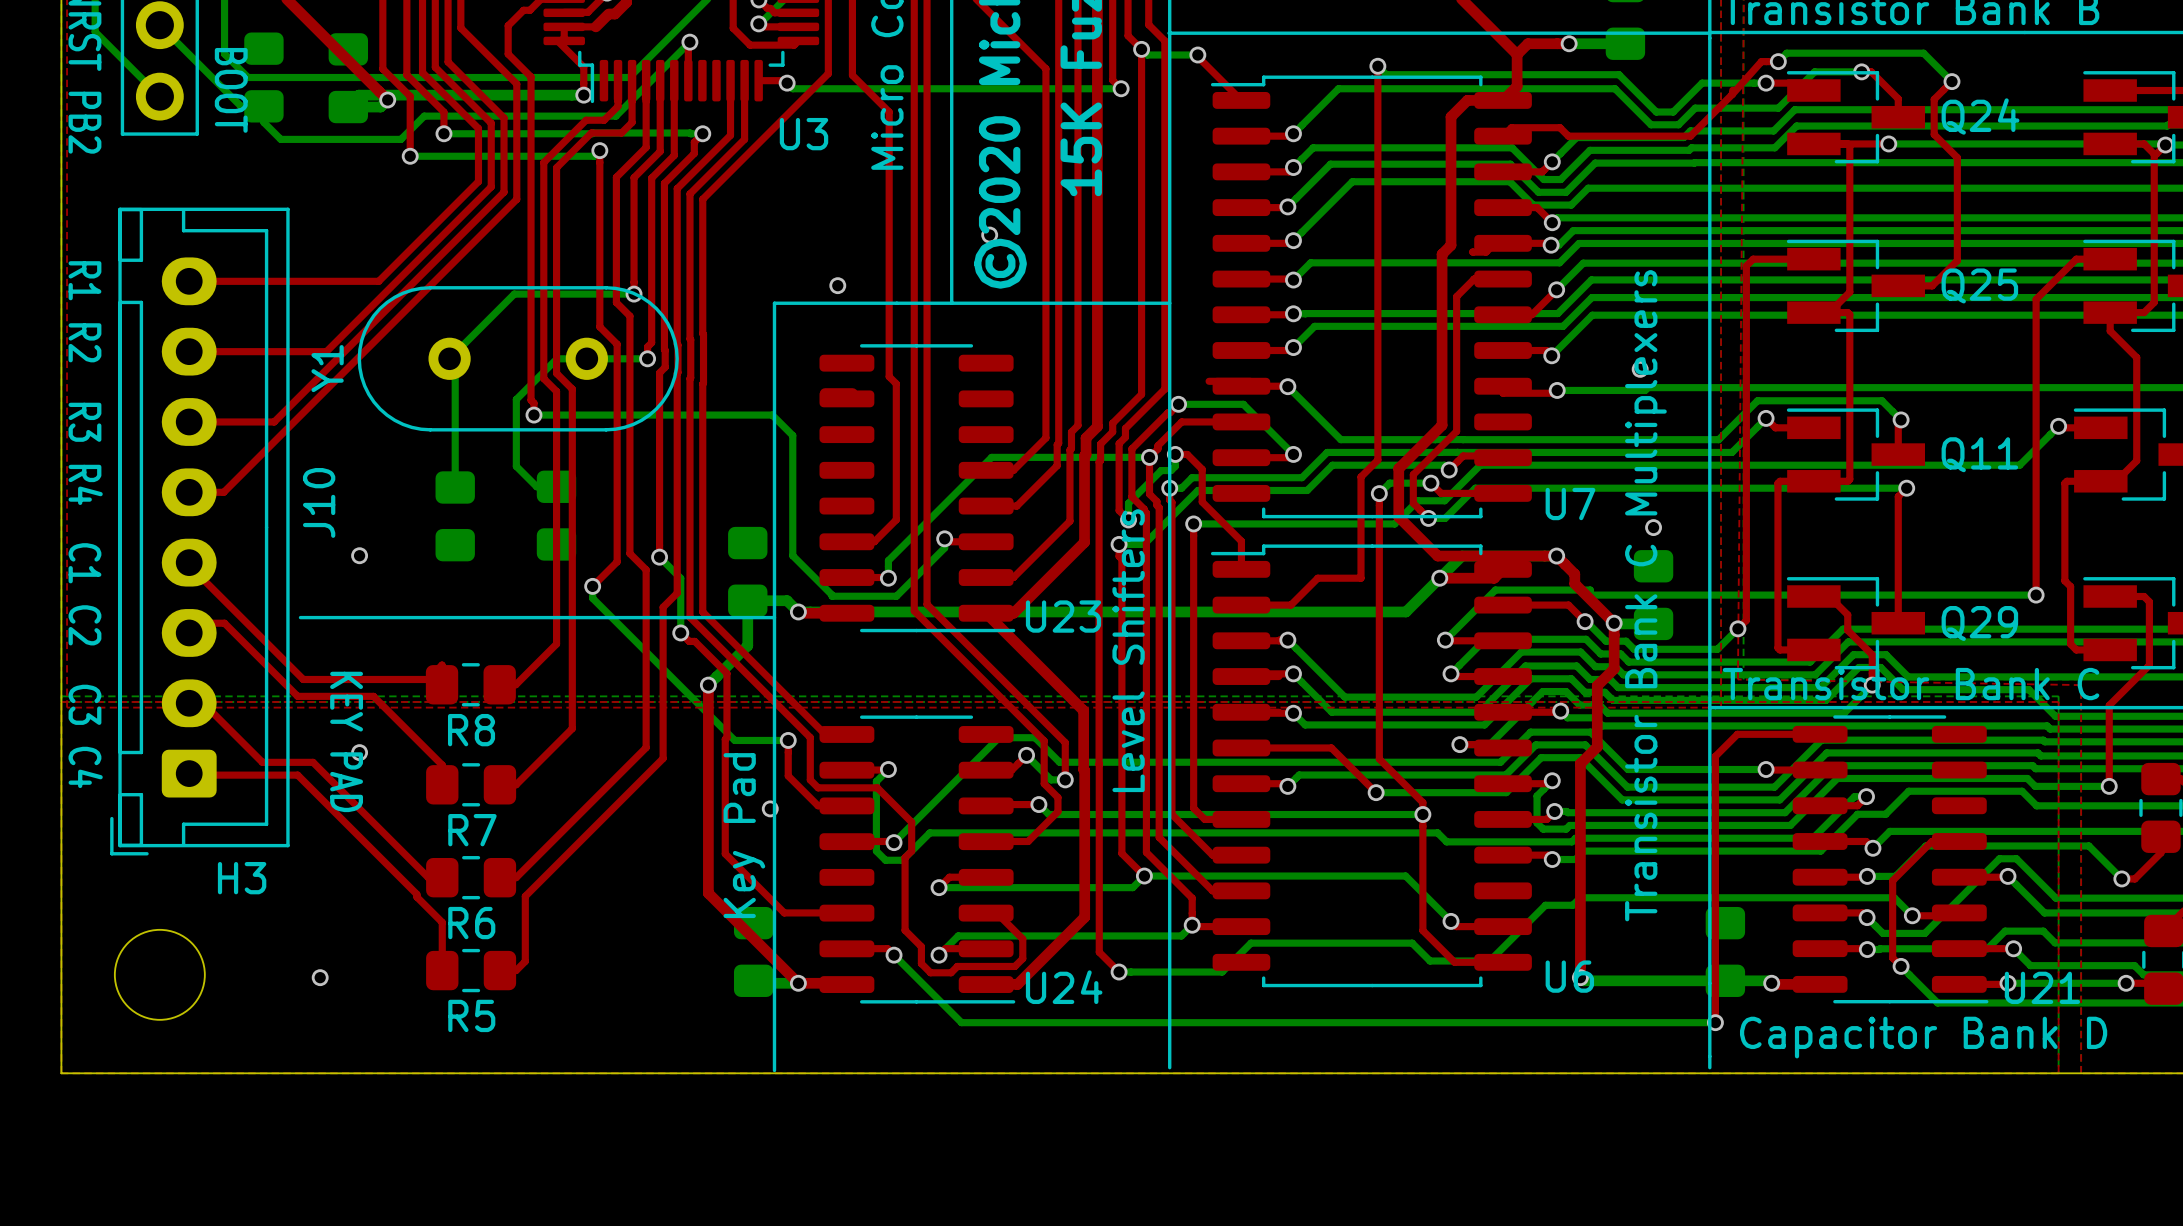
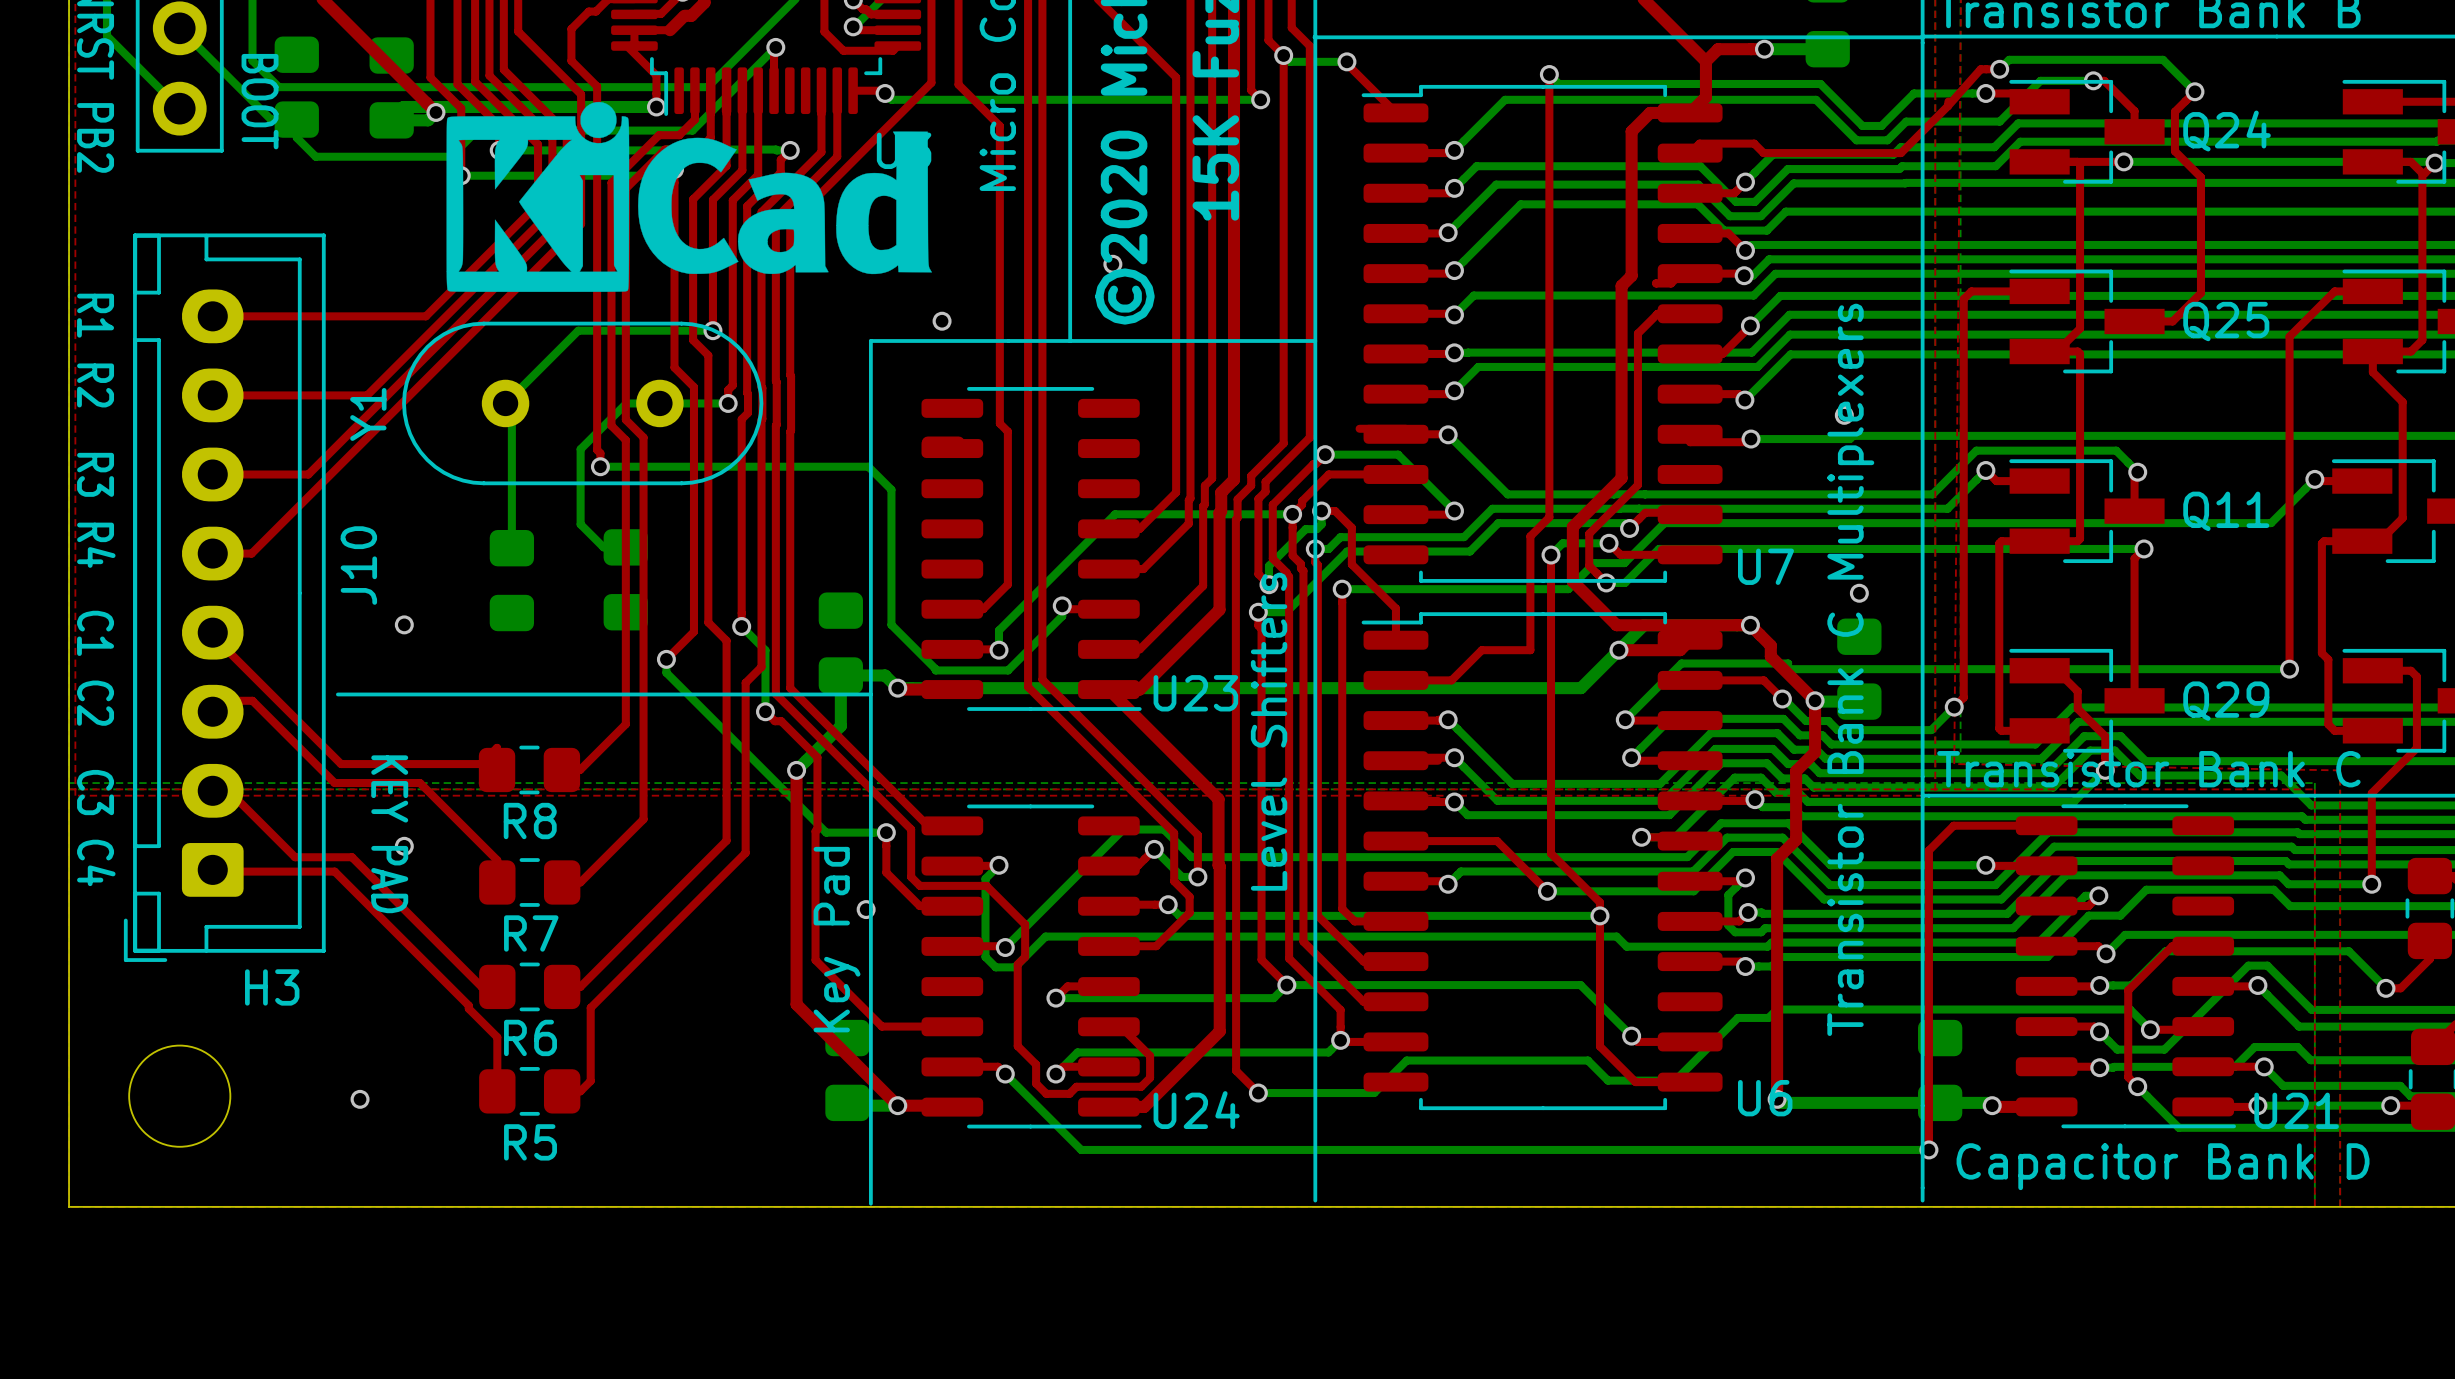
drawing: none -> [446, 101, 932, 292]

